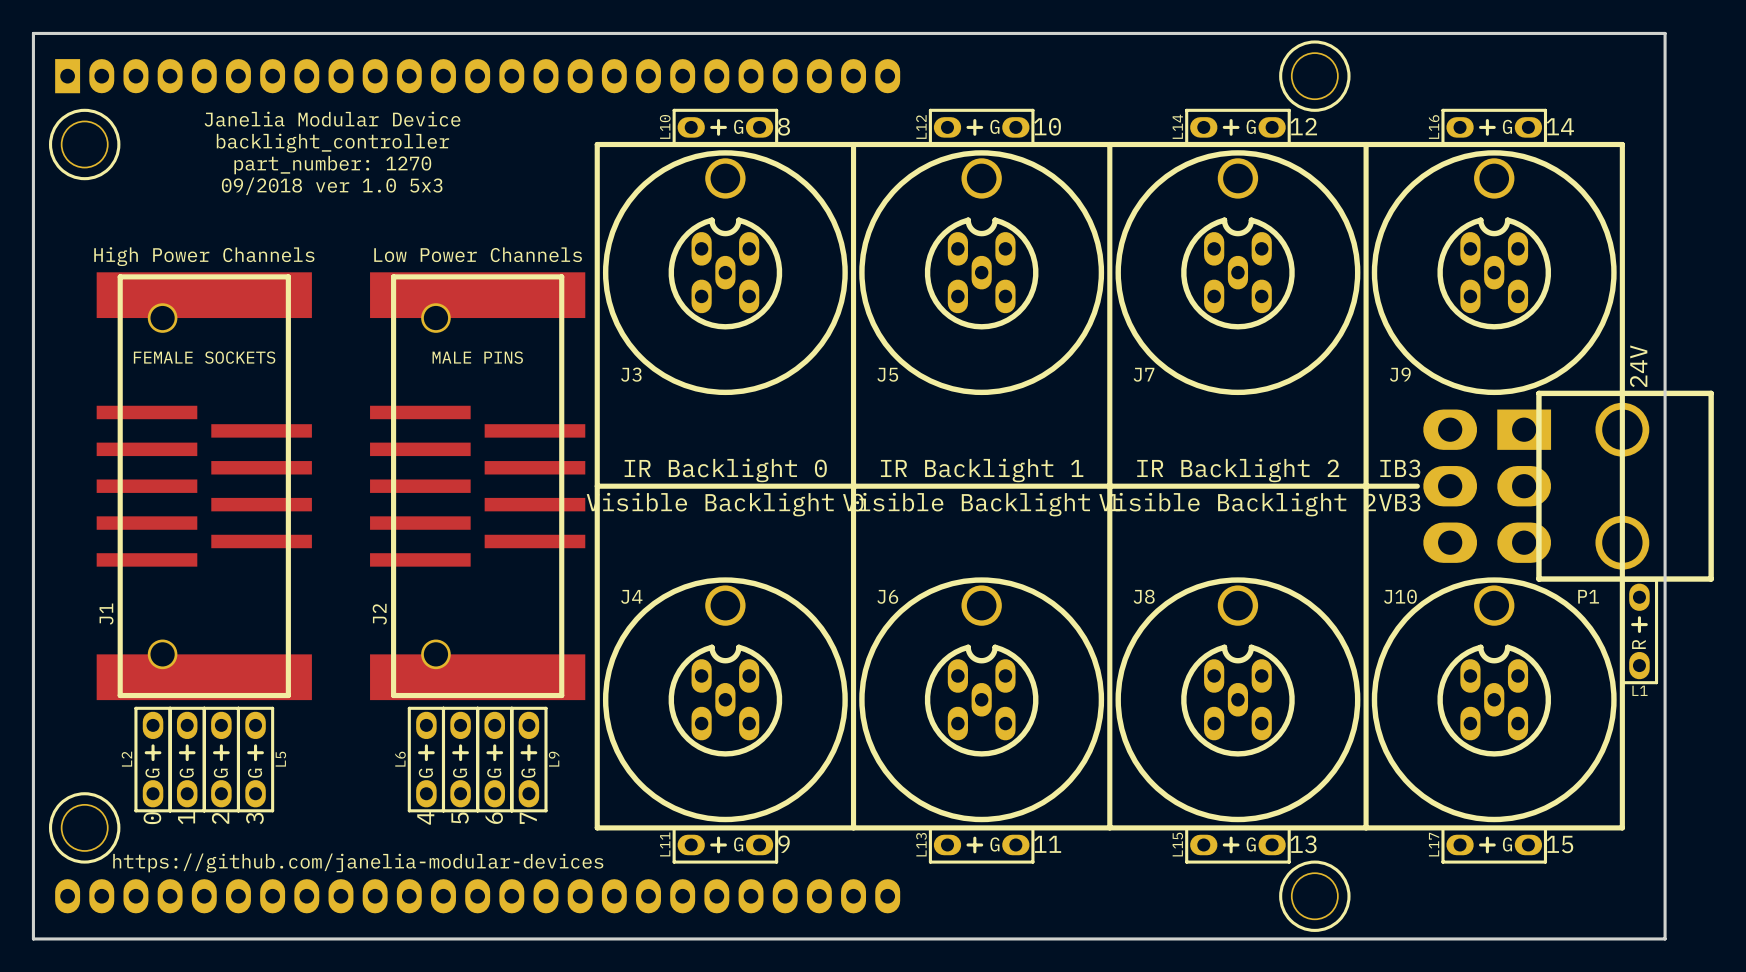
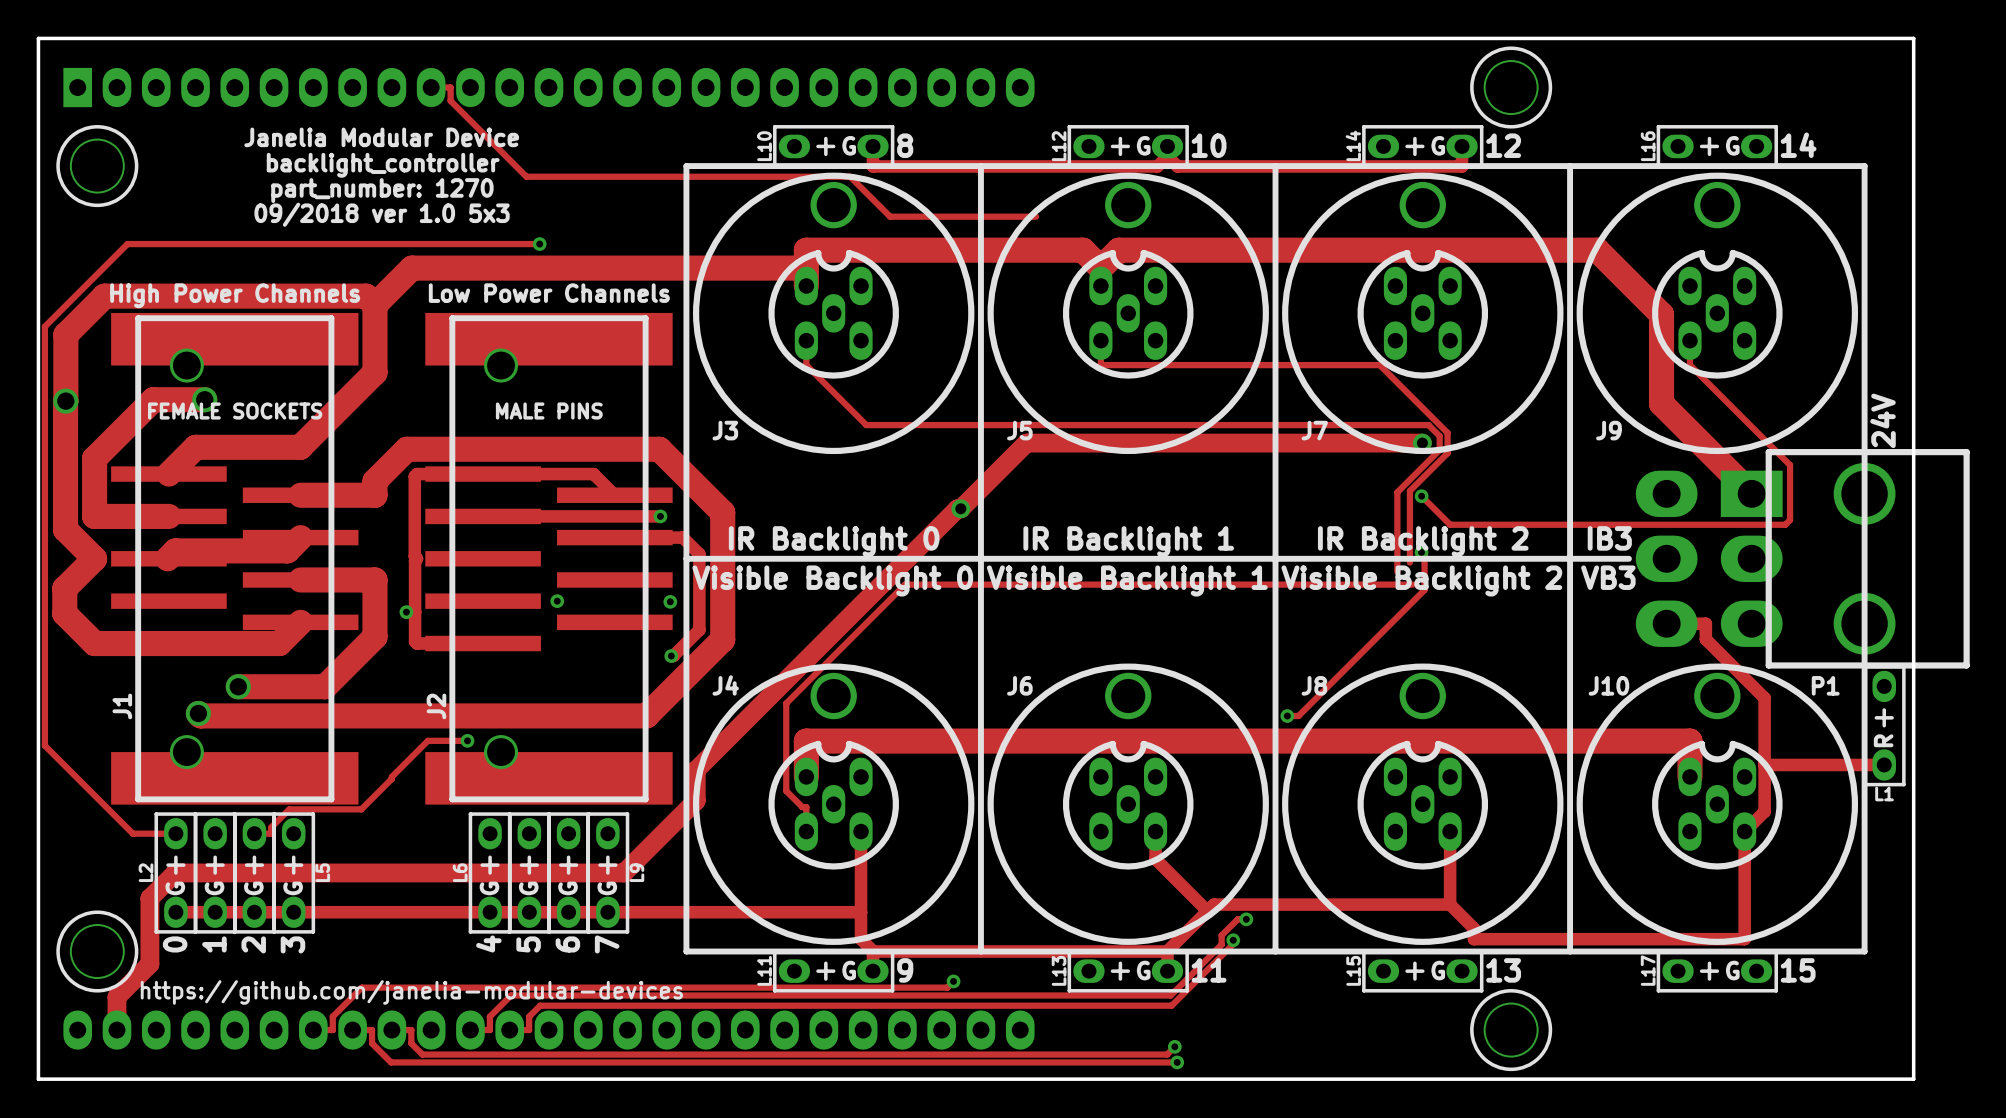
track: none -> (431, 87) (450, 87) (450, 100) (526, 176) (850, 176) (890, 216) (1036, 216)
track: none -> (872, 146) (872, 166) (1157, 166) (1167, 156)
track: none -> (1462, 146) (1462, 166) (1177, 166) (1167, 156)
track: none -> (539, 244) (127, 244) (44, 326) (44, 745) (132, 833) (175, 833)
via: none -> (539, 244)
track: none -> (806, 268) (411, 268) (374, 305)
track: none -> (806, 286) (806, 250) (1082, 250) (1100, 268) (1118, 250) (1597, 250) (1661, 314) (1661, 403) (1751, 493)
track: none -> (374, 305) (366, 296) (104, 296) (65, 334) (65, 529) (94, 558) (64, 588) (64, 613) (94, 643) (279, 643) (300, 622)
track: none -> (374, 305) (374, 372) (300, 447) (195, 447) (168, 474)
track: none -> (806, 340) (806, 365) (866, 425) (1428, 425) (1439, 436) (1439, 450) (1397, 492) (1397, 571)
track: none -> (1100, 340) (1100, 365) (1379, 365) (1447, 432) (1447, 453) (1409, 490) (1409, 562)
track: none -> (1689, 340) (1689, 365) (1790, 465) (1790, 520) (1785, 524) (1450, 524) (1421, 496)
track: none -> (204, 399) (153, 399) (94, 458) (94, 516) (168, 516)
via: none -> (204, 399)
via: none -> (65, 401)
track: none -> (1422, 443) (1026, 443) (960, 508) (957, 508) (696, 770) (696, 800) (623, 872) (175, 872) (149, 898) (149, 964) (116, 997) (116, 1030)
via: none -> (1422, 443)
track: none -> (300, 495) (374, 495) (374, 481) (406, 449) (659, 449) (722, 512) (722, 639) (646, 715) (200, 715) (198, 713)
track: none -> (614, 495) (593, 474) (417, 474) (414, 476) (414, 556) (417, 558) (415, 560) (415, 641) (417, 643) (483, 643)
via: none -> (1421, 496)
via: none -> (960, 508)
track: none -> (483, 516) (660, 516)
via: none -> (660, 516)
track: none -> (300, 537) (287, 550) (175, 550) (167, 558)
track: none -> (614, 537) (682, 537) (699, 554) (699, 629) (671, 656)
track: none -> (1421, 552) (1424, 555) (1424, 589) (1298, 716) (1287, 716)
via: none -> (1421, 552)
track: none -> (300, 579) (374, 579) (374, 636) (325, 686) (238, 686)
track: none -> (1412, 584) (905, 584) (786, 703) (786, 790) (802, 807) (806, 807) (806, 831)
via: none -> (557, 601)
via: none -> (670, 601)
via: none -> (406, 612)
track: none -> (1666, 623) (1705, 623) (1705, 639) (1764, 698) (1764, 811) (1744, 831) (1744, 939) (1473, 939) (1473, 928) (1450, 904)
via: none -> (671, 656)
via: none -> (238, 686)
via: none -> (198, 713)
via: none -> (1287, 716)
track: none -> (467, 740) (427, 740) (361, 809) (289, 809) (271, 827) (271, 833) (254, 833)
via: none -> (467, 740)
track: none -> (1764, 764) (1884, 764)
track: none -> (806, 776) (806, 741) (1689, 741) (1689, 776)
track: none -> (861, 831) (861, 939) (872, 951) (872, 971)
track: none -> (1155, 831) (1155, 859) (1207, 911)
track: none -> (1450, 831) (1450, 904)
track: none -> (1450, 904) (1214, 904) (1167, 951) (1167, 971)
track: none -> (175, 912) (861, 912)
track: none -> (1246, 919) (1237, 919) (1221, 935) (1221, 944) (1170, 995) (511, 995) (489, 1016) (489, 1030) (470, 1030)
via: none -> (1246, 919)
track: none -> (1233, 940) (1233, 944) (1171, 1005) (540, 1005) (529, 1016) (529, 1030) (509, 1030)
via: none -> (1233, 940)
track: none -> (872, 951) (1167, 951)
track: none -> (953, 981) (947, 987) (361, 987) (332, 1016) (332, 1030) (313, 1030)
via: none -> (953, 981)
track: none -> (352, 1030) (372, 1030) (372, 1043) (391, 1062) (1177, 1062)
track: none -> (391, 1030) (411, 1030) (411, 1043) (422, 1054) (1167, 1054) (1174, 1046)
via: none -> (1174, 1046)
via: none -> (1177, 1062)

